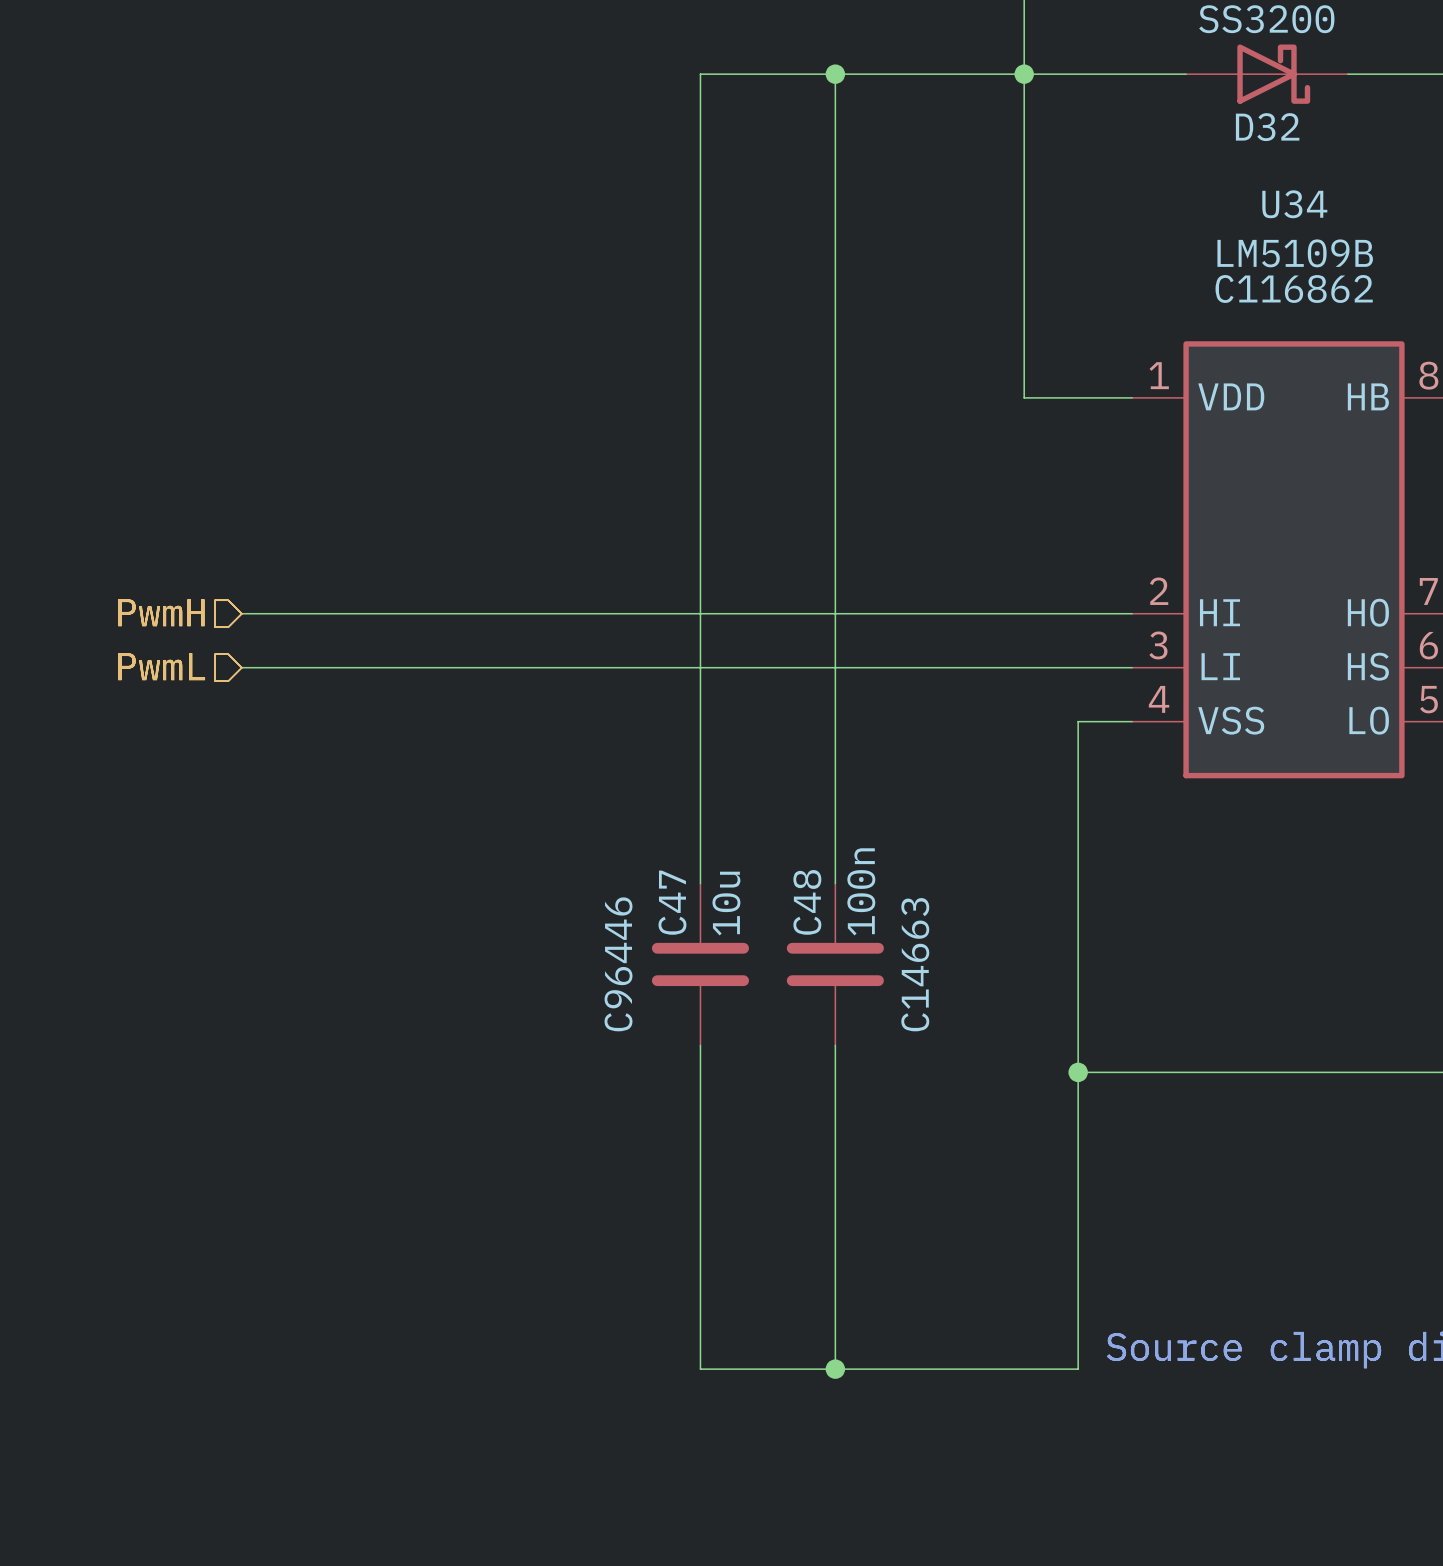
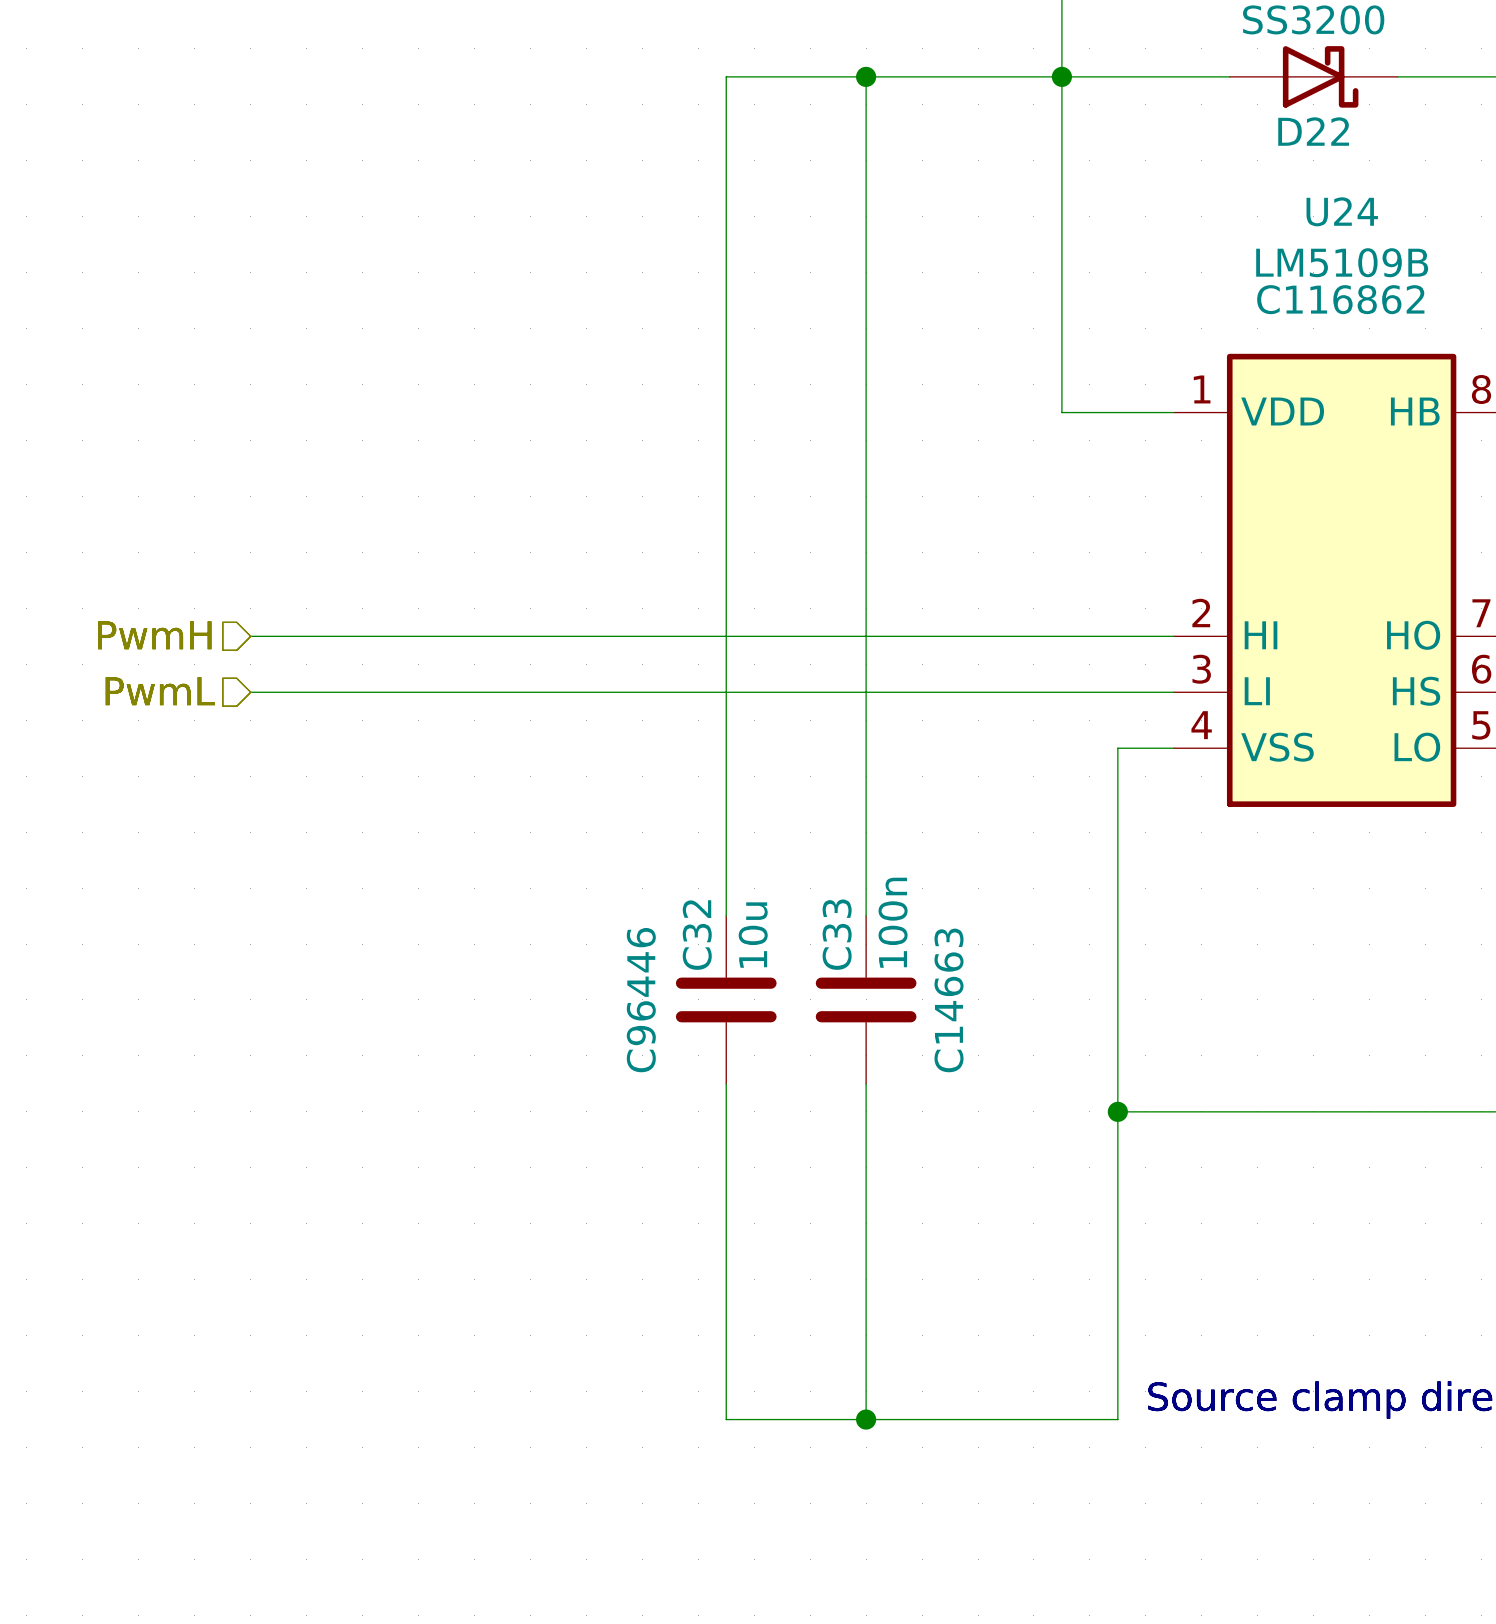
D32 name: D32 (1267, 127) -> D22 (1313, 131)
U34 name: U34 (1294, 204) -> U24 (1342, 211)
C47 name: C47 (672, 902) -> C32 (697, 935)
C48 name: C48 (807, 902) -> C33 (837, 934)

